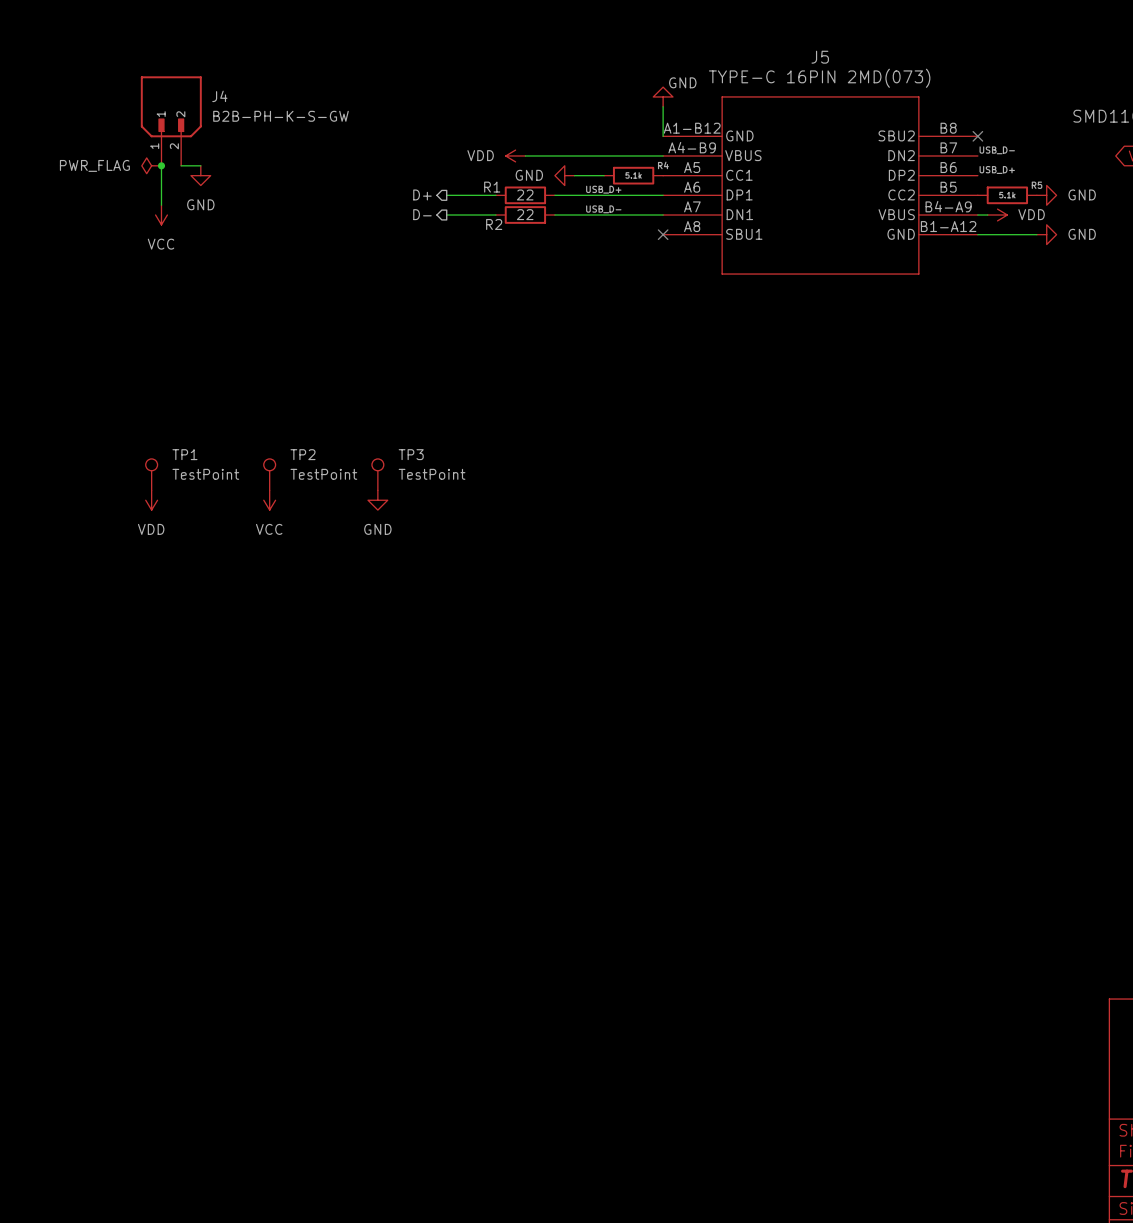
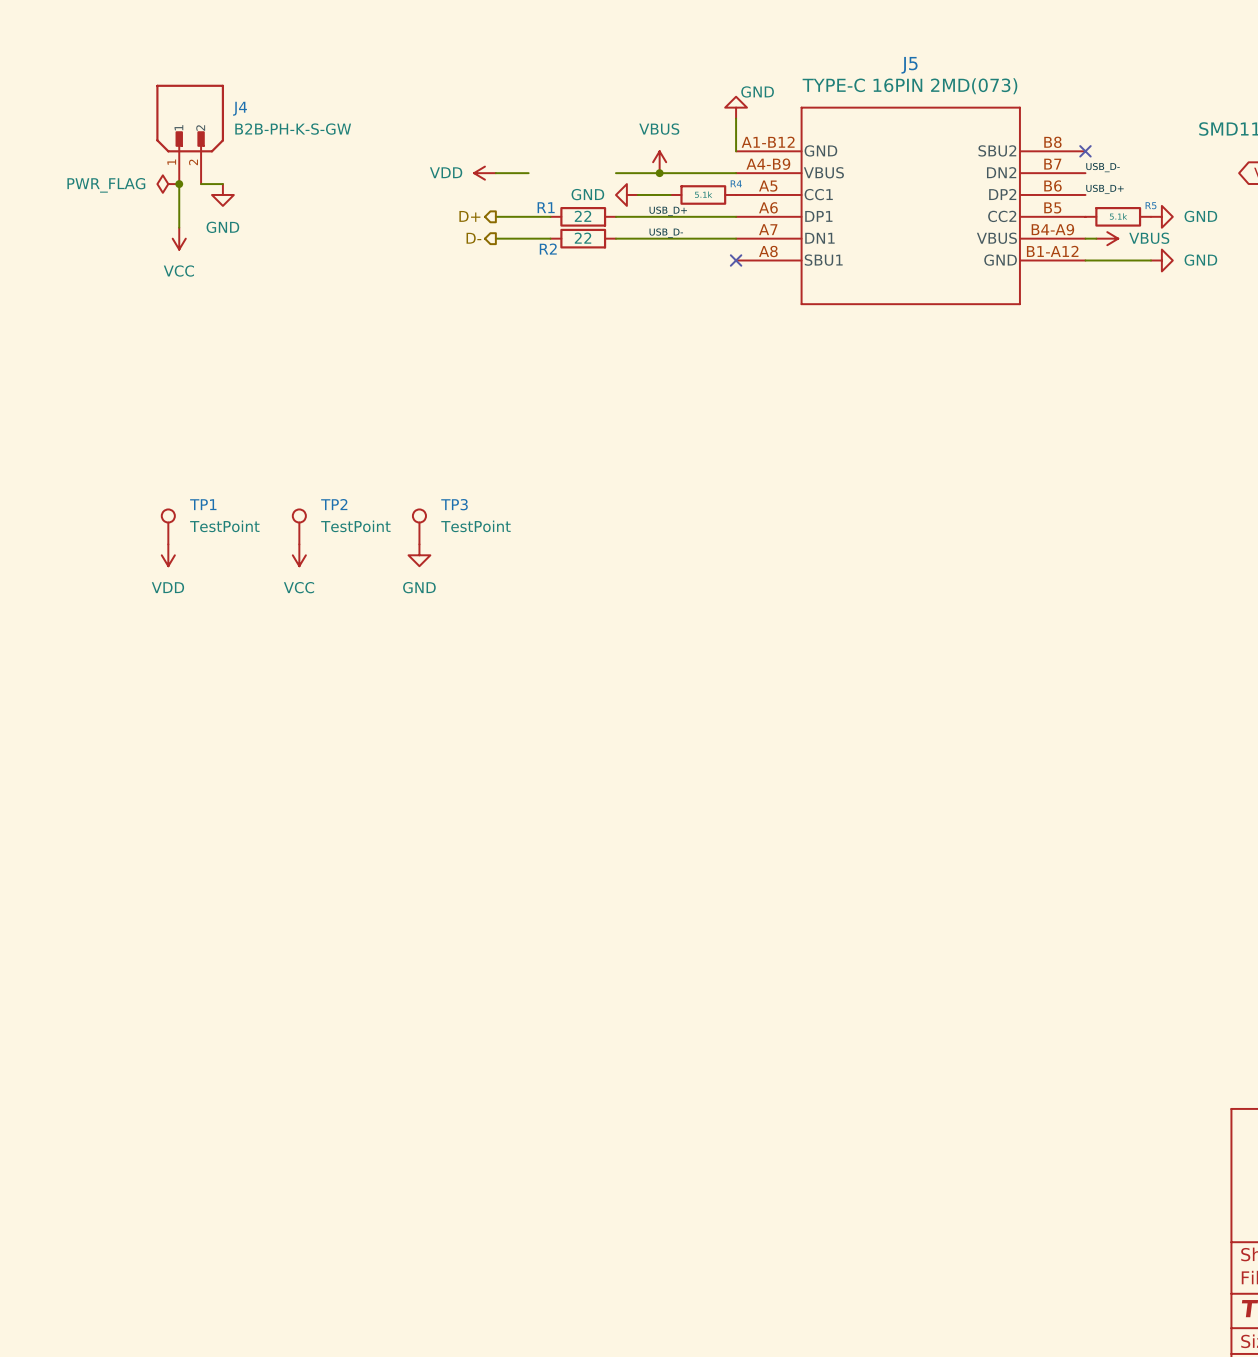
power symbol: none -> VBUS (659, 162)
power symbol position: VDD (515, 155) -> VDD (484, 173)
wire: (525, 155) (554, 155) -> (495, 173) (528, 173)
junction: none -> (659, 173)
power symbol: VDD (997, 215) -> VBUS (1107, 238)

